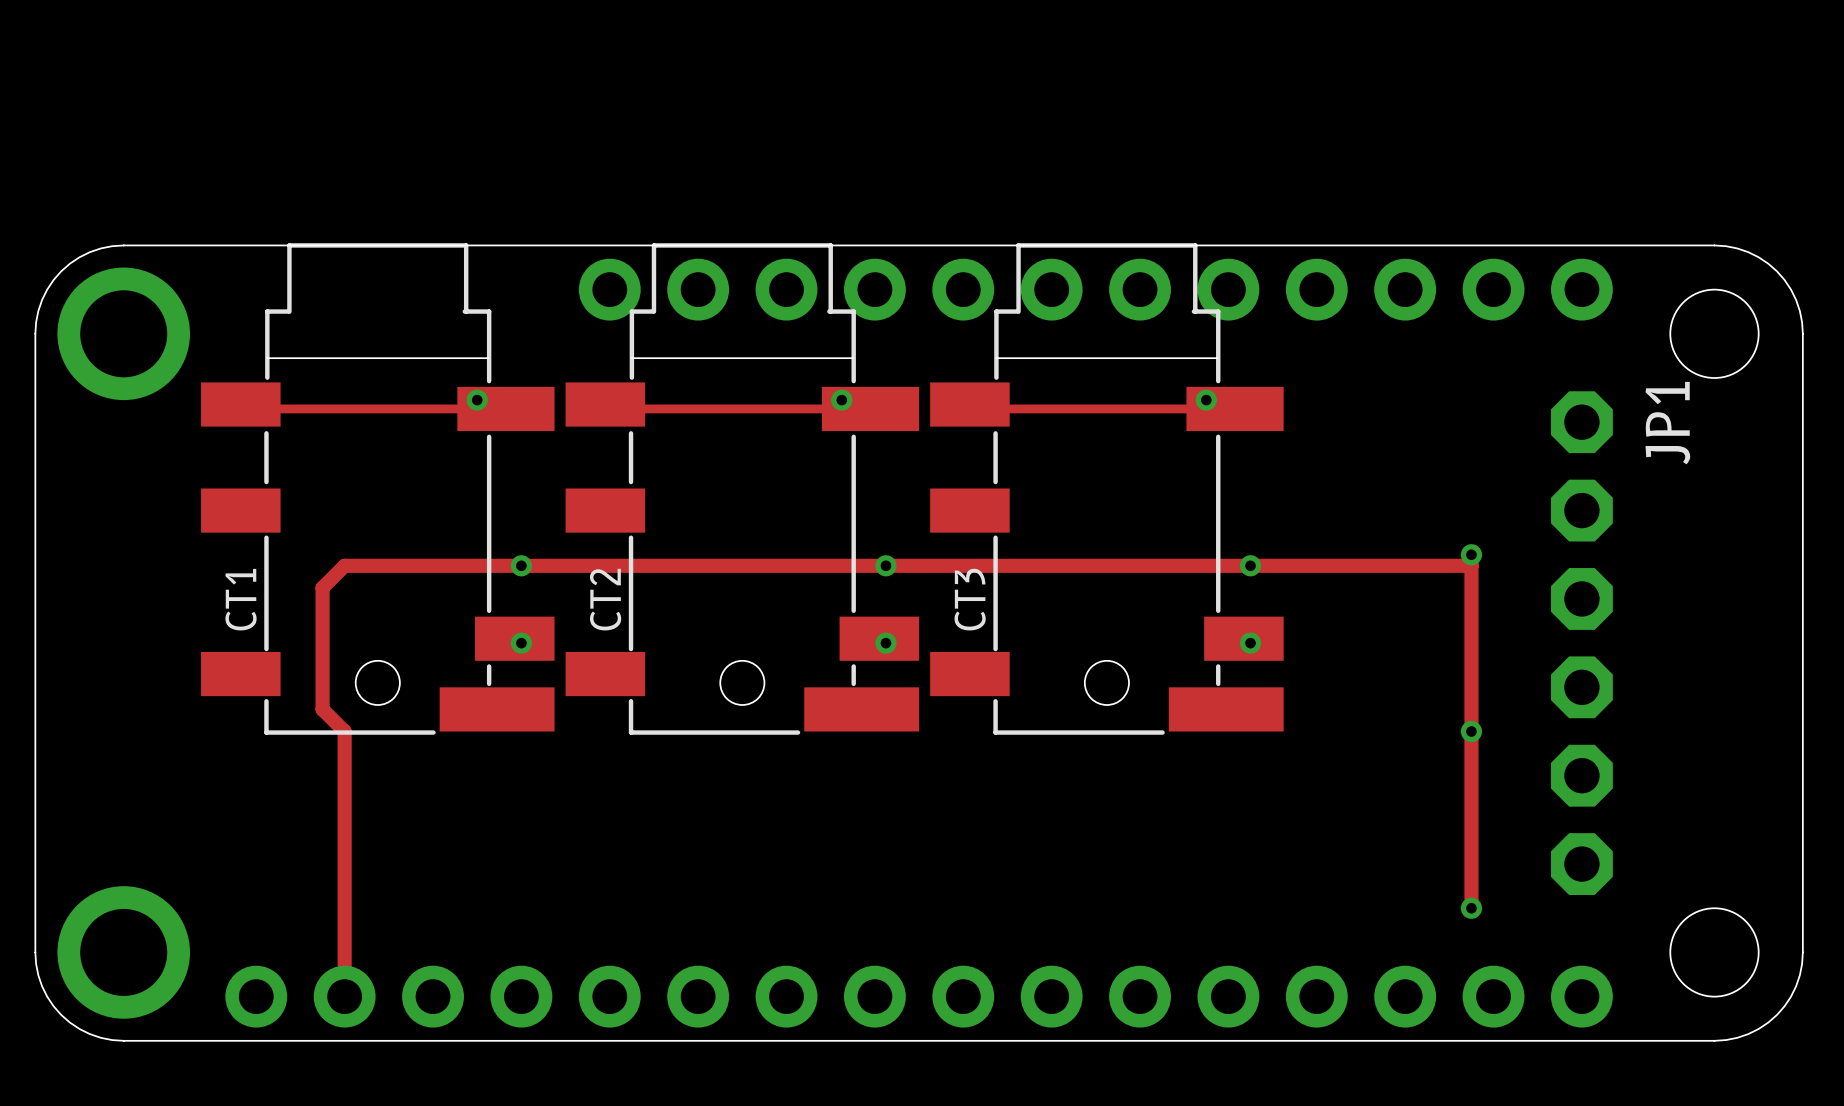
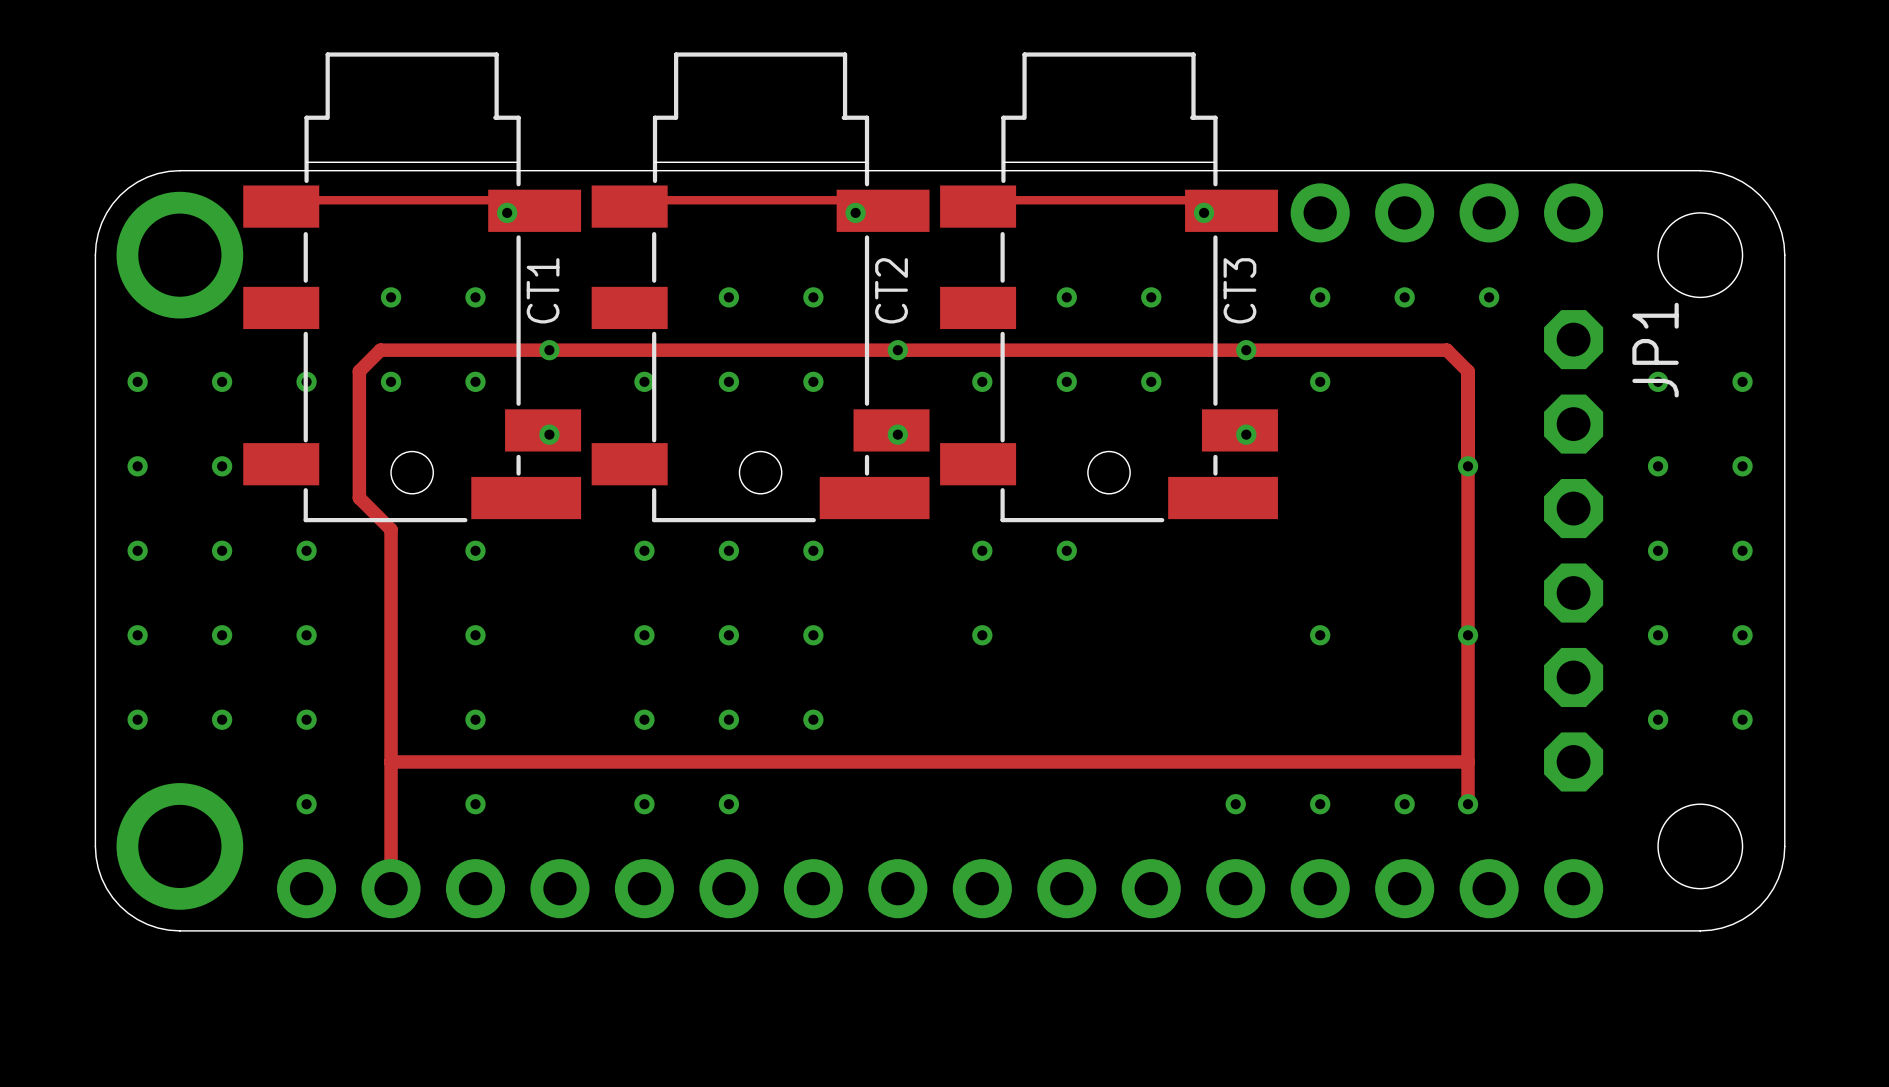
part footprint: [35, 245, 1803, 1041] -> [95, 170, 1785, 931]
track: none -> (507, 200) (281, 200) (281, 206)
track: none -> (1204, 200) (978, 200) (978, 206)
track: none -> (629, 206) (629, 200) (855, 200) (855, 212) (883, 210)
via: none -> (507, 212)
via: none -> (855, 212)
via: none -> (1204, 212)
via: none -> (391, 297)
via: none -> (475, 297)
via: none -> (728, 297)
via: none -> (813, 297)
via: none -> (1066, 297)
via: none -> (1151, 297)
via: none -> (1320, 297)
via: none -> (1404, 297)
via: none -> (1489, 297)
via: (477, 400) -> none
via: (841, 400) -> none
via: (1206, 400) -> none
track: (240, 404) (240, 408) (532, 408) -> none
track: (605, 404) (605, 408) (870, 408) -> none
track: (969, 404) (969, 408) (1235, 408) -> none
via: none -> (549, 350)
via: none -> (897, 350)
via: none -> (1246, 350)
via: none -> (137, 381)
via: none -> (222, 381)
via: none -> (306, 381)
via: none -> (391, 381)
via: none -> (475, 381)
via: none -> (644, 381)
via: none -> (728, 381)
via: none -> (813, 381)
via: none -> (982, 381)
via: none -> (1066, 381)
via: none -> (1151, 381)
via: none -> (1320, 381)
via: none -> (1658, 381)
via: none -> (1742, 381)
CT1 position: (377, 488) -> (412, 287)
CT2 position: (742, 488) -> (760, 287)
CT3 position: (1106, 488) -> (1109, 287)
via: none -> (137, 466)
via: none -> (222, 466)
via: none -> (1658, 466)
via: none -> (1742, 466)
via position: (521, 565) -> (549, 434)
via position: (885, 565) -> (897, 434)
via position: (1250, 565) -> (1246, 434)
track: (1471, 565) (344, 565) (322, 587) (322, 709) (344, 731) -> (1468, 466) (1468, 371) (1446, 350) (380, 350) (359, 371) (359, 498) (391, 529) (391, 635)
CT1 name position: CT1 (240, 599) -> CT1 (543, 290)
CT2 name position: CT2 (605, 599) -> CT2 (891, 290)
CT3 name position: CT3 (970, 599) -> CT3 (1239, 290)
via: none -> (137, 550)
via: none -> (222, 550)
via: none -> (306, 550)
via: none -> (475, 550)
via: (521, 643) -> none
via: none -> (644, 550)
via: none -> (728, 550)
via: none -> (813, 550)
via: (885, 643) -> none
via: none -> (982, 550)
via: none -> (1066, 550)
via: (1250, 643) -> none
via: none -> (1658, 550)
via: none -> (1742, 550)
via: none -> (137, 635)
via: none -> (222, 635)
via: none -> (306, 635)
via: none -> (475, 635)
via: none -> (644, 635)
via: none -> (728, 635)
via: none -> (813, 635)
via: none -> (982, 635)
via: none -> (1320, 635)
via: none -> (1658, 635)
via: none -> (1742, 635)
via: none -> (137, 719)
via: none -> (222, 719)
via: none -> (306, 719)
via: none -> (475, 719)
via: none -> (644, 719)
via: none -> (728, 719)
via: none -> (813, 719)
via: none -> (1658, 719)
via: none -> (1742, 719)
track: none -> (391, 761) (1468, 761)
via: none -> (306, 804)
via: none -> (475, 804)
via: none -> (644, 804)
via: none -> (728, 804)
via: none -> (1235, 804)
via: none -> (1320, 804)
via: none -> (1404, 804)

